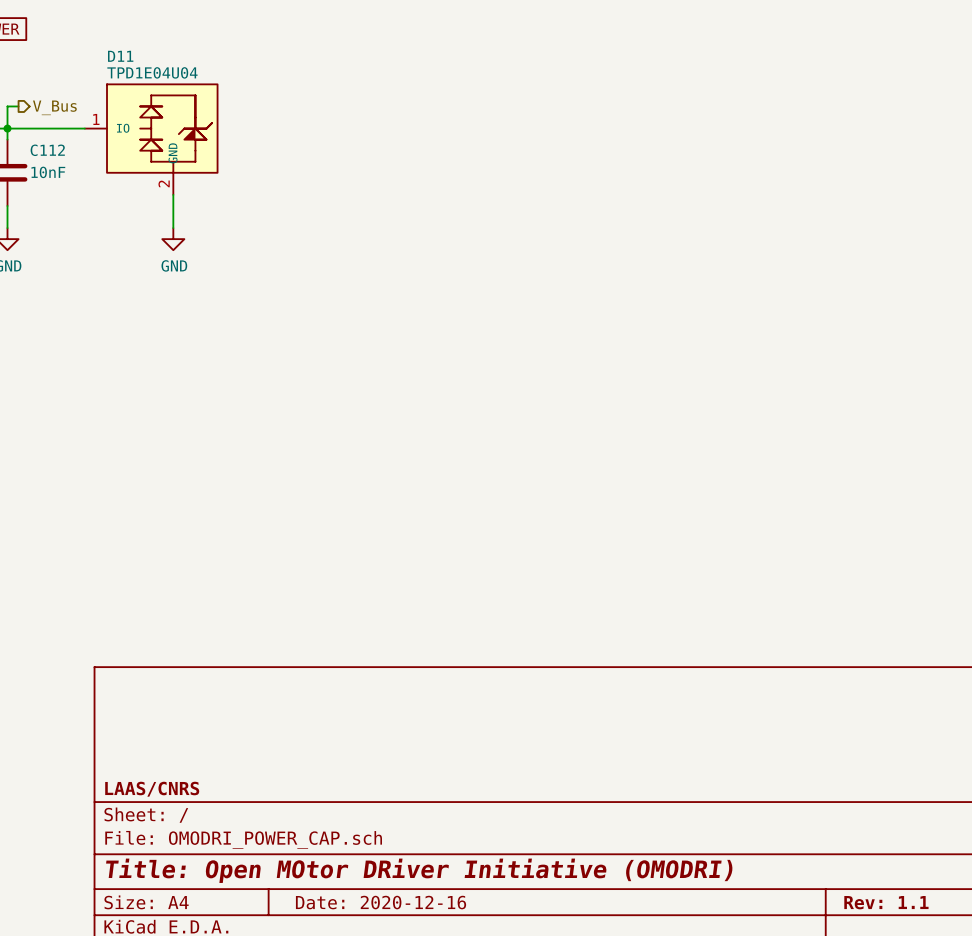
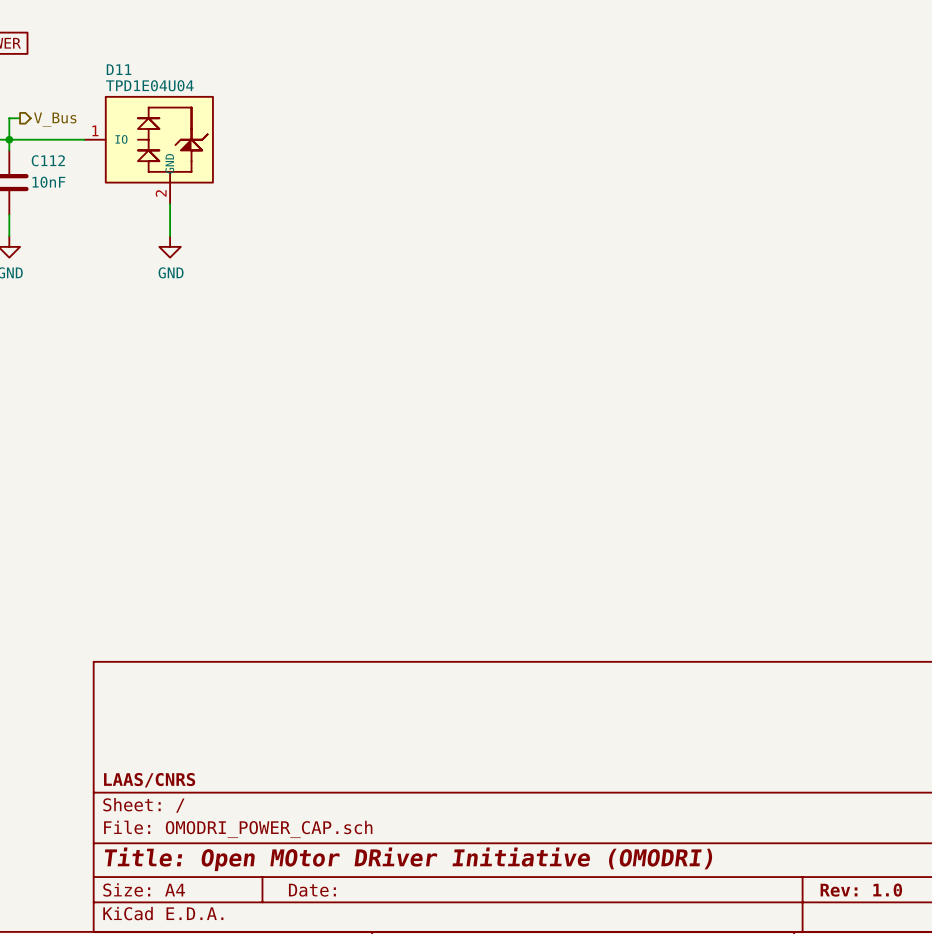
title block: Date: 2020-12-16 (381, 902) -> Date: (312, 890)
title block: Rev: 1.1 (886, 902) -> Rev: 1.0 (861, 890)

